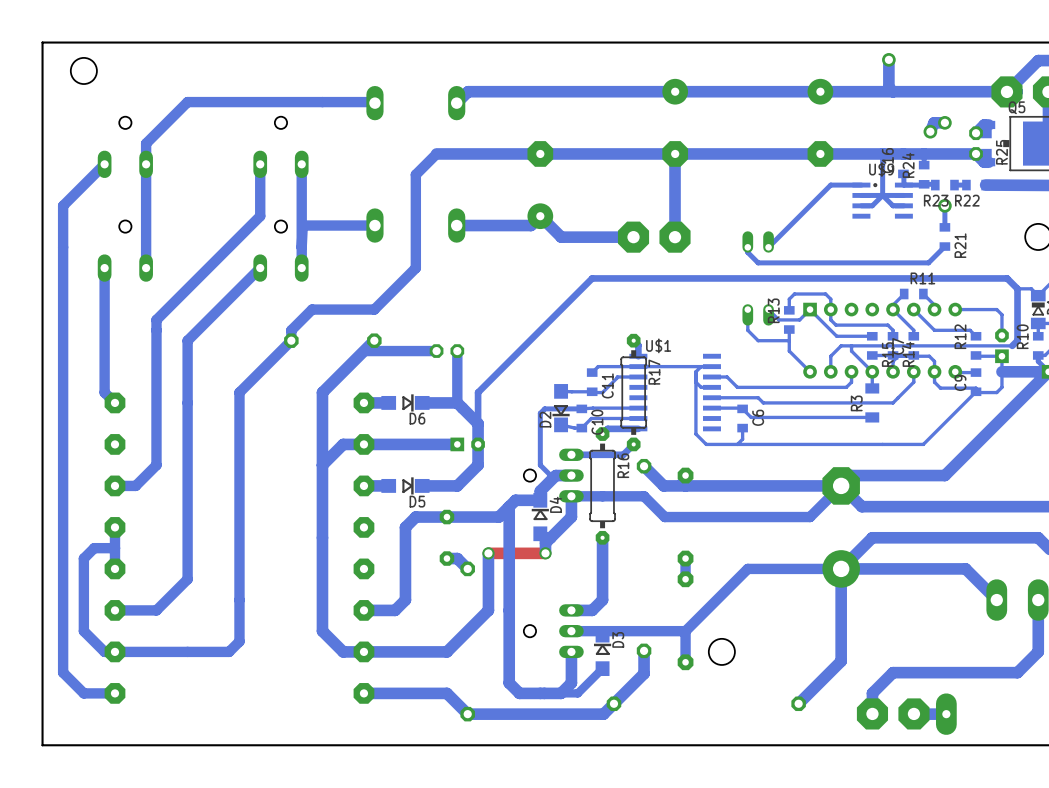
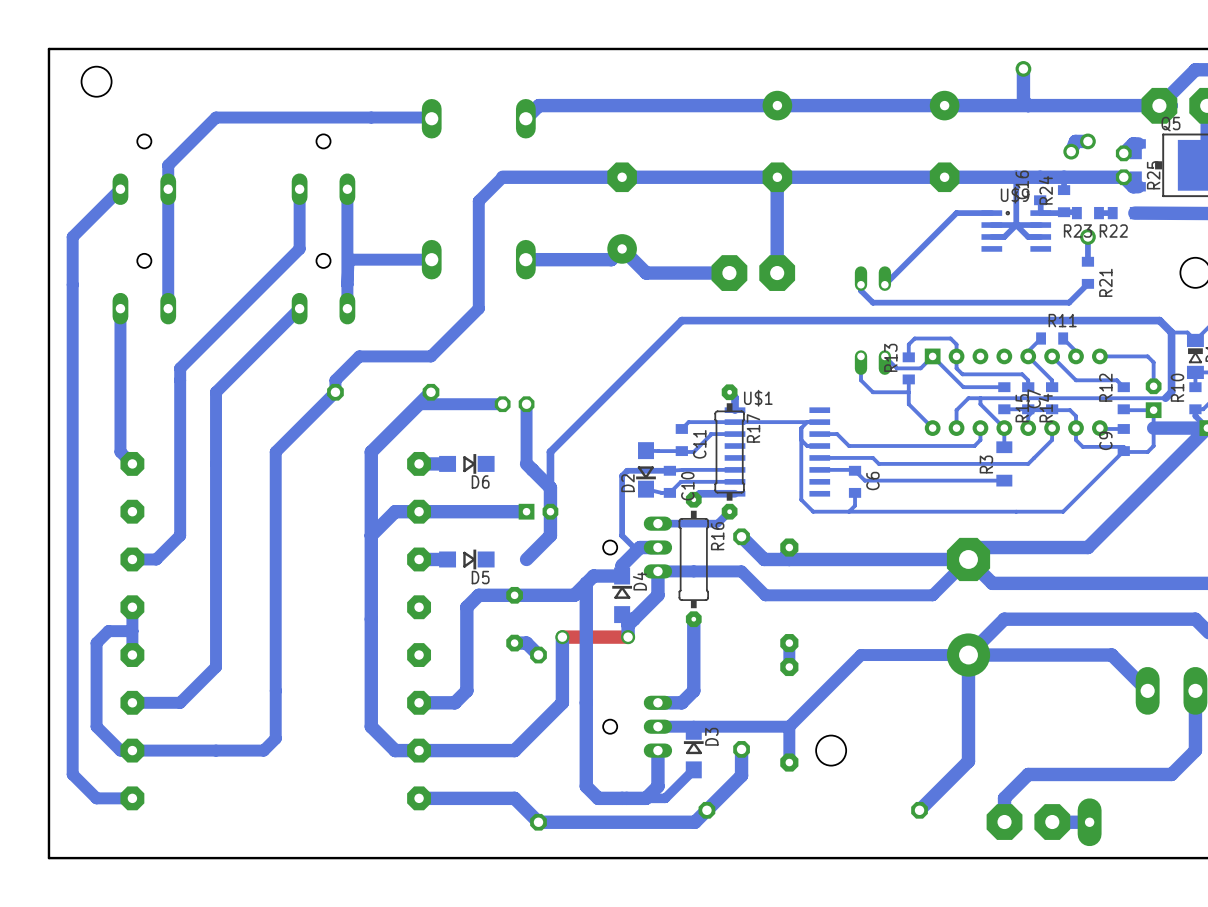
bottom track: (457, 402) (422, 402) -> none
bottom track: (457, 485) (422, 485) -> none

